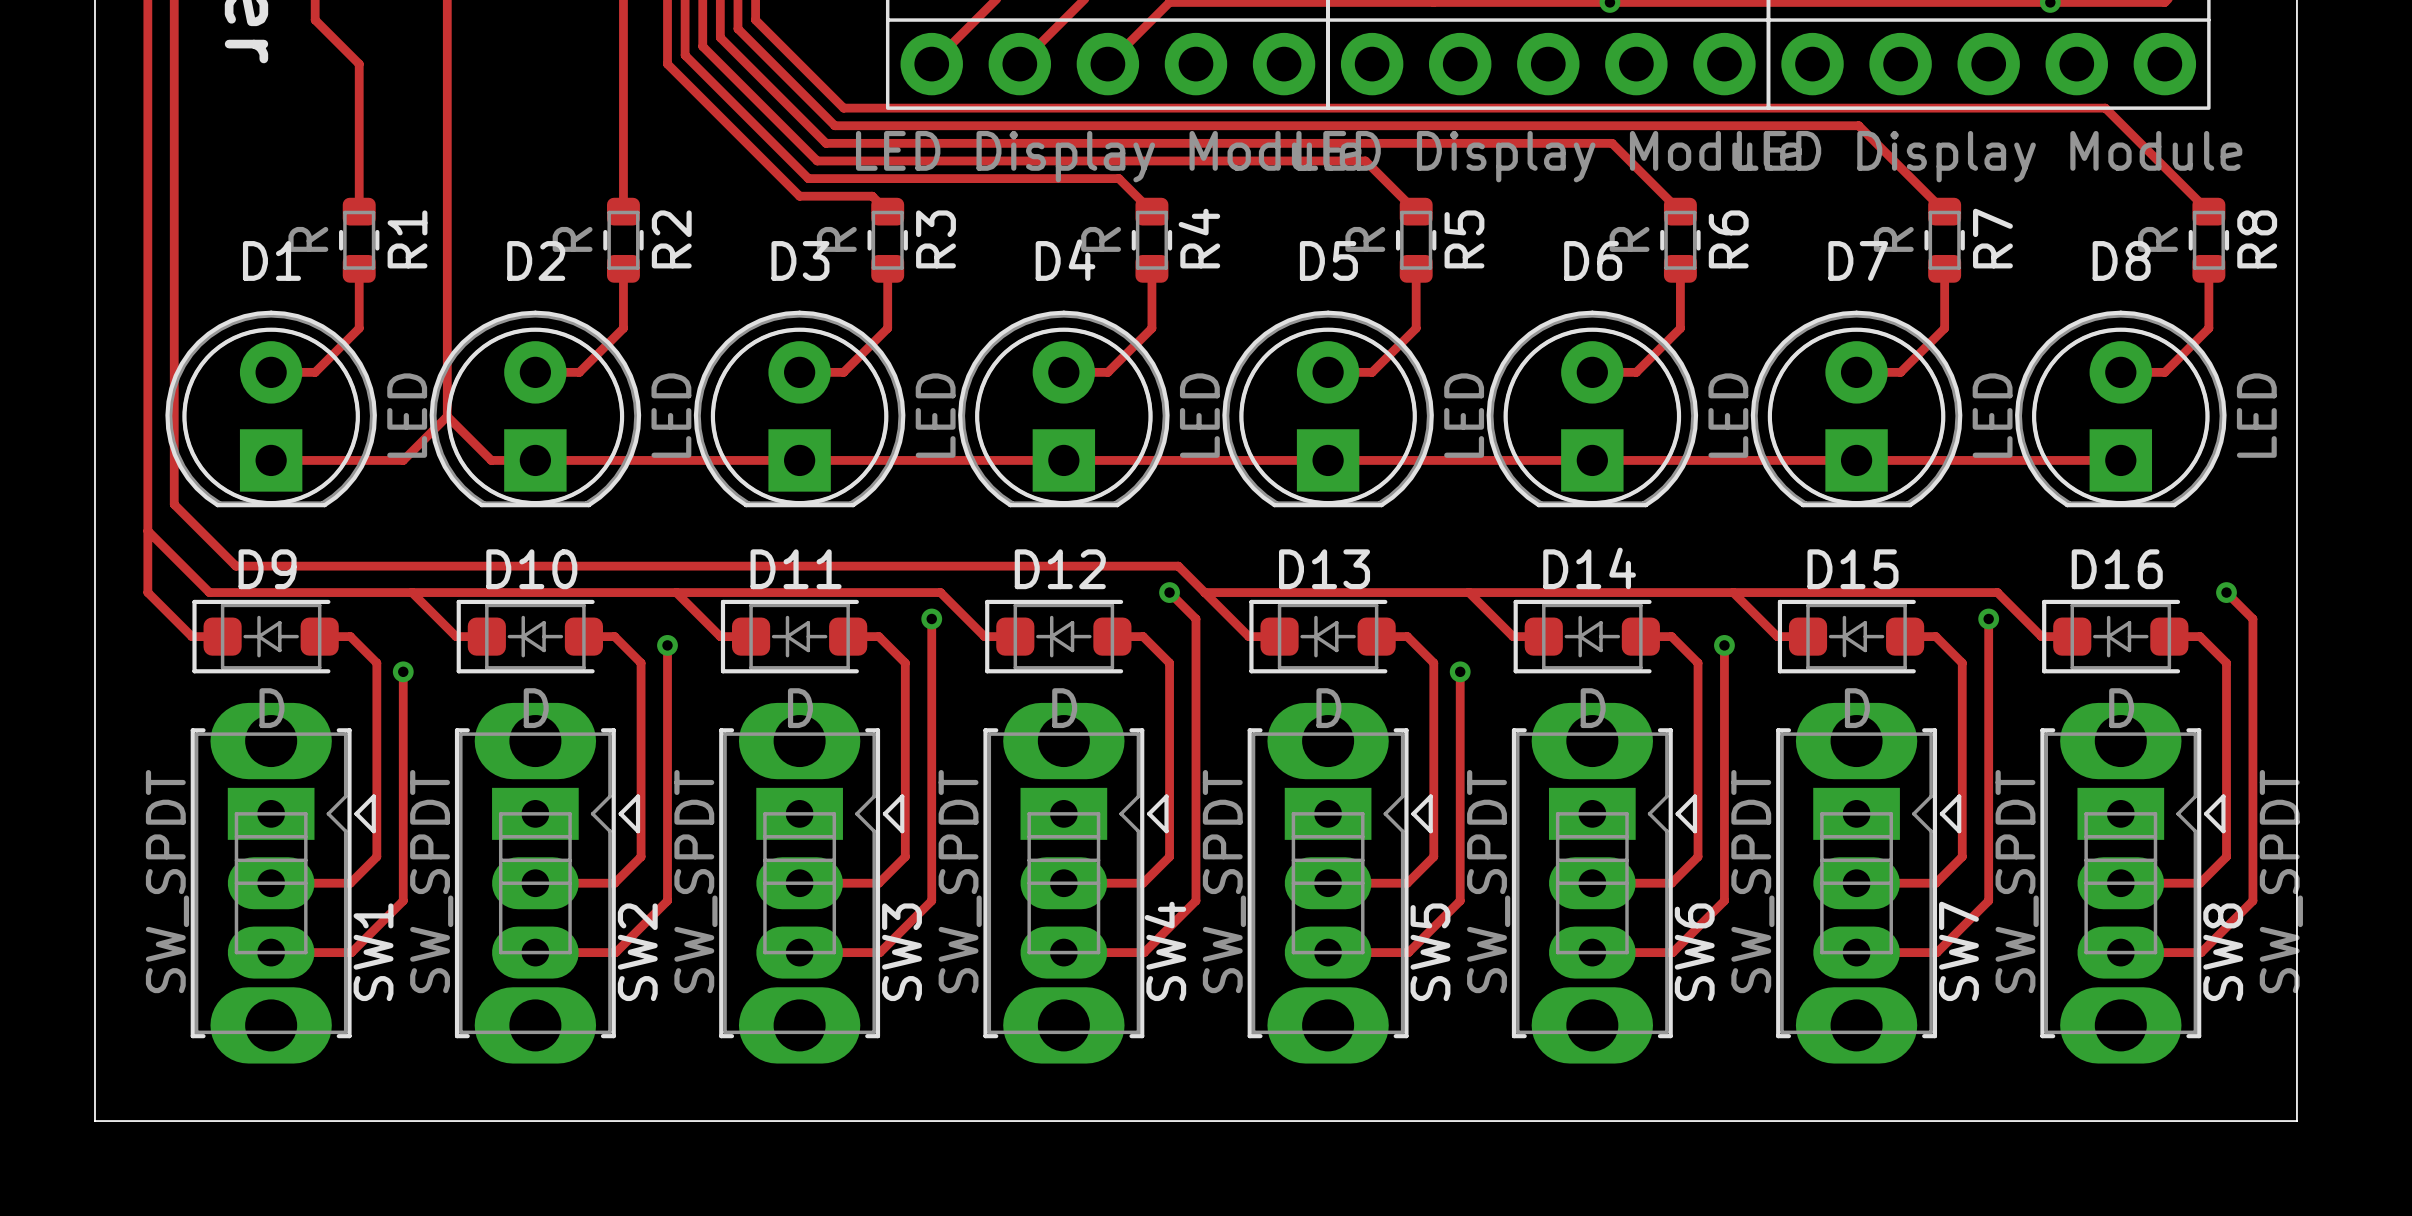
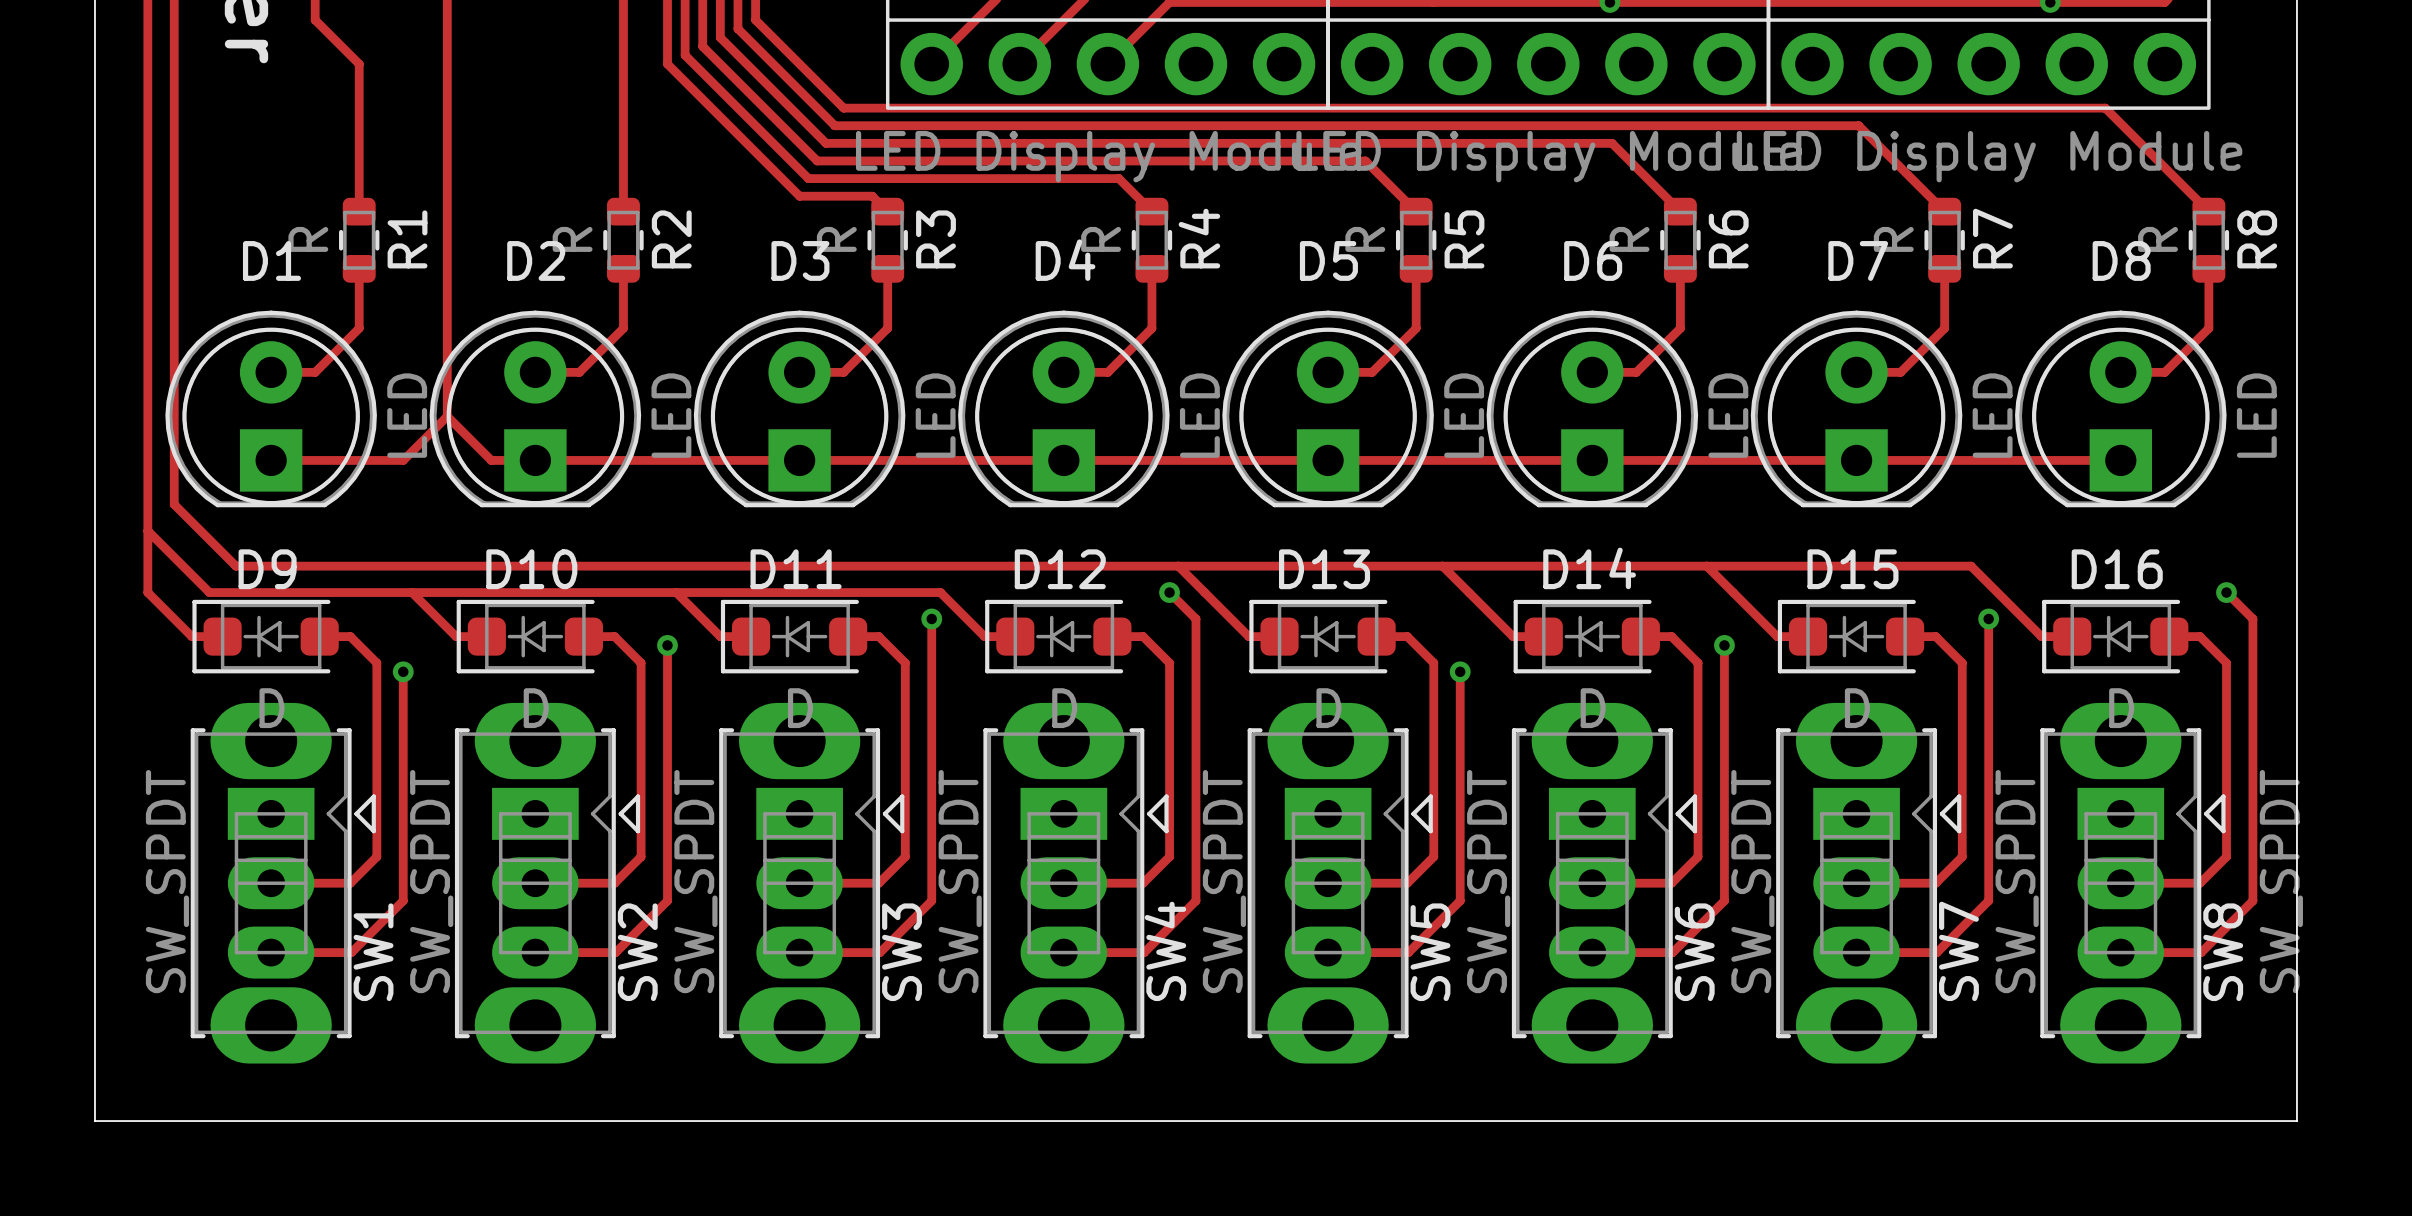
track: none -> (1442, 566) (1469, 592)
track: none -> (1706, 566) (1733, 592)
track: (1204, 592) (1997, 592) -> (1178, 566) (1971, 566) (1997, 592)

